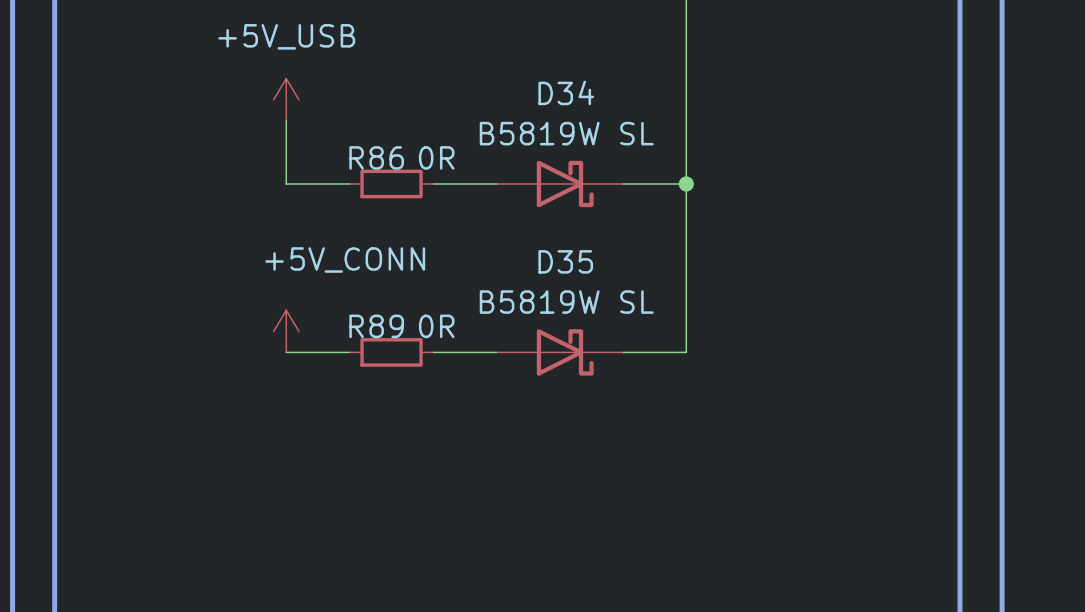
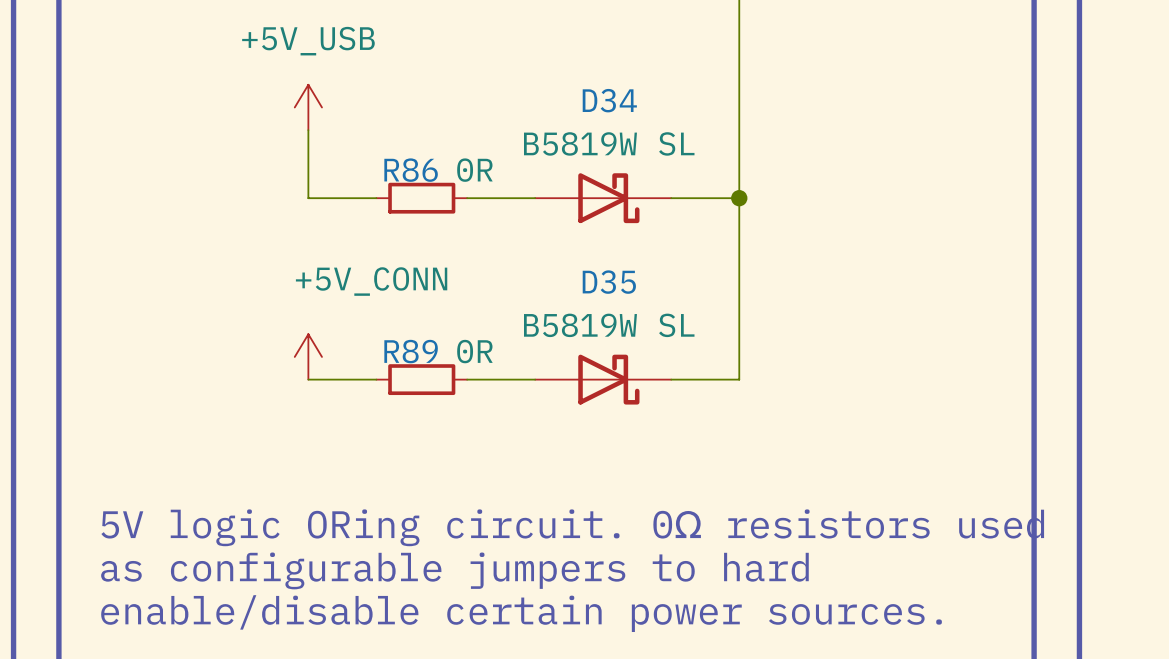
text: none -> 5V logic ORing circuit. 0Ω resistors used (572, 527)
text: none -> as configurable jumpers to hard (454, 570)
text: none -> enable/disable certain power sources. (521, 613)

